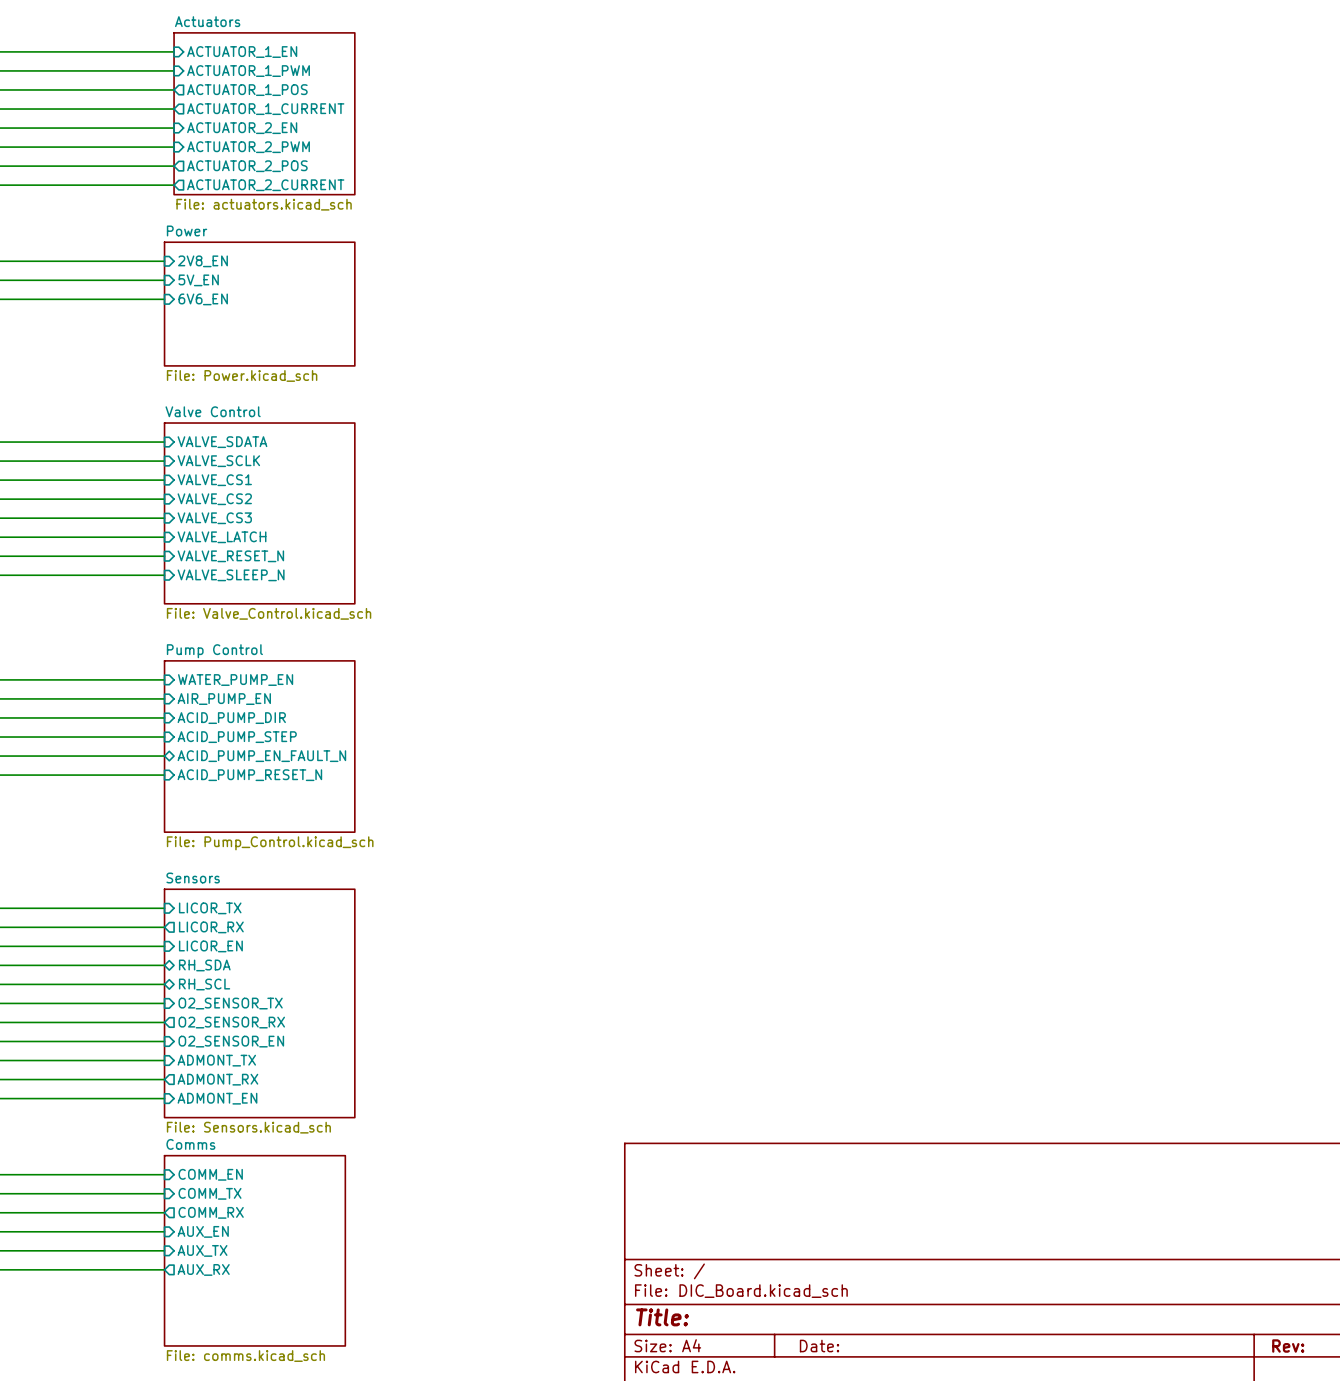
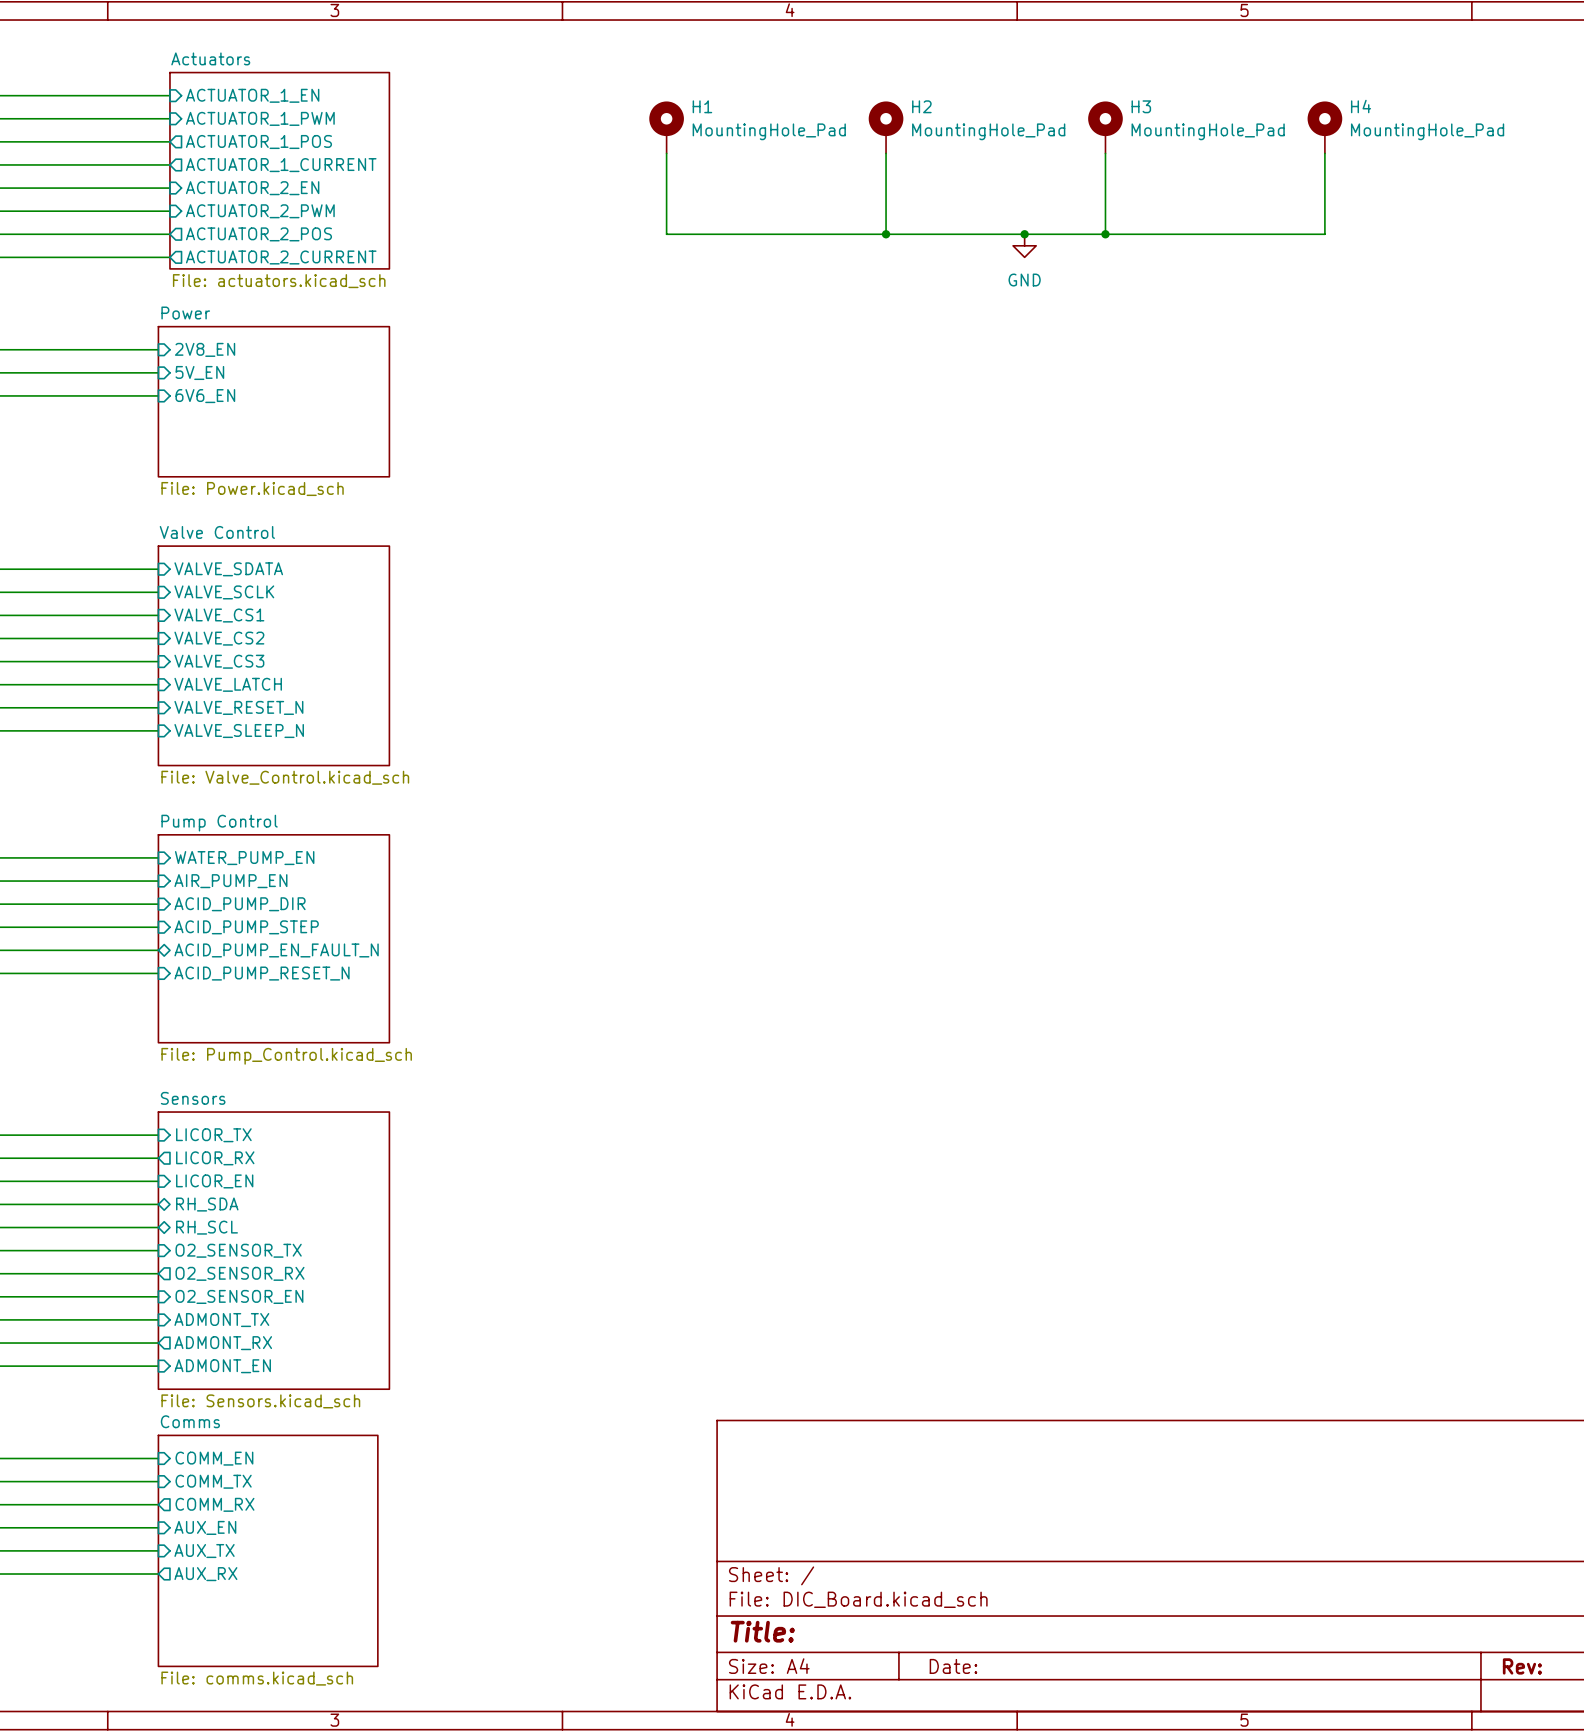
H1: none -> MountingHole_Pad (666, 127)
H2: none -> MountingHole_Pad (886, 127)
H3: none -> MountingHole_Pad (1105, 127)
H4: none -> MountingHole_Pad (1324, 127)
wire: none -> (666, 153) (666, 234) (1324, 234) (1324, 153)
wire: none -> (886, 153) (886, 234)
wire: none -> (1105, 153) (1105, 234)
junction: none -> (886, 234)
junction: none -> (1024, 234)
junction: none -> (1105, 234)
power symbol: none -> GND (1024, 245)

